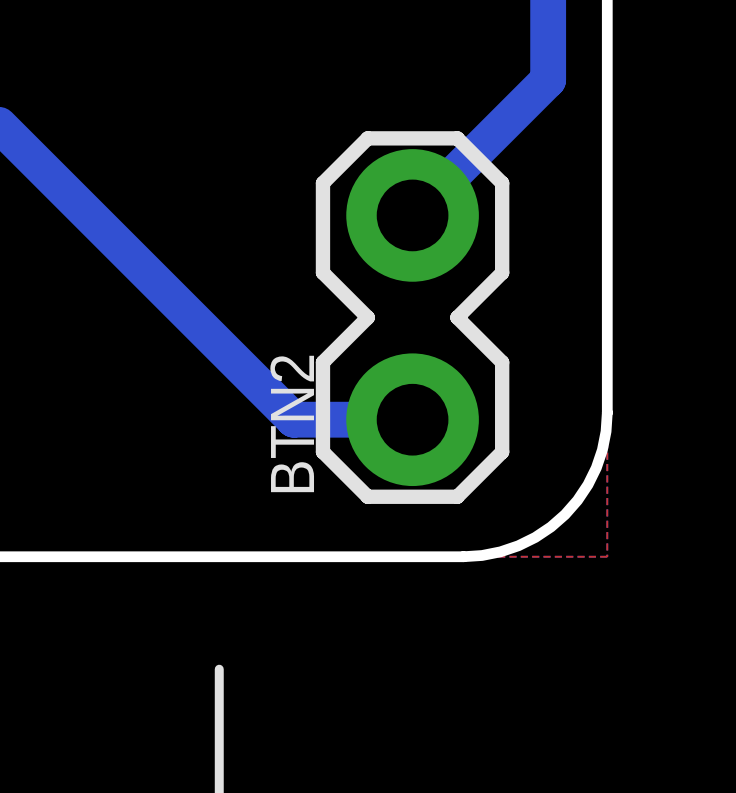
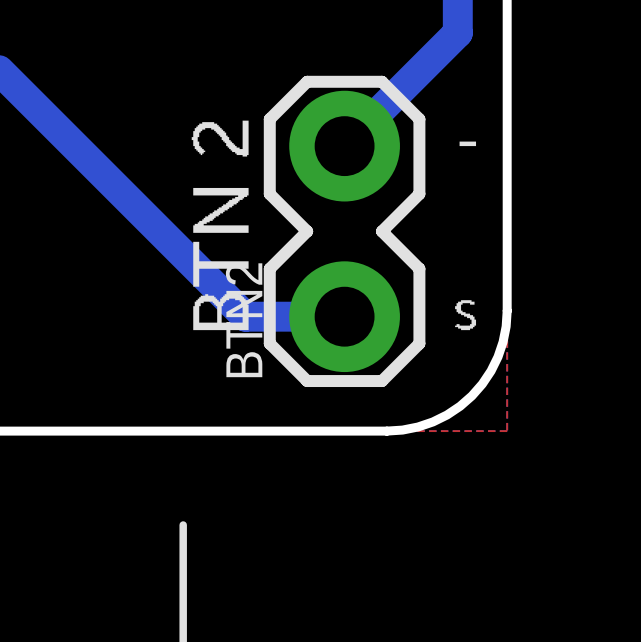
drawing: none -> [191, 120, 249, 331]
drawing: none -> [459, 141, 477, 147]
drawing: none -> [455, 300, 477, 331]

